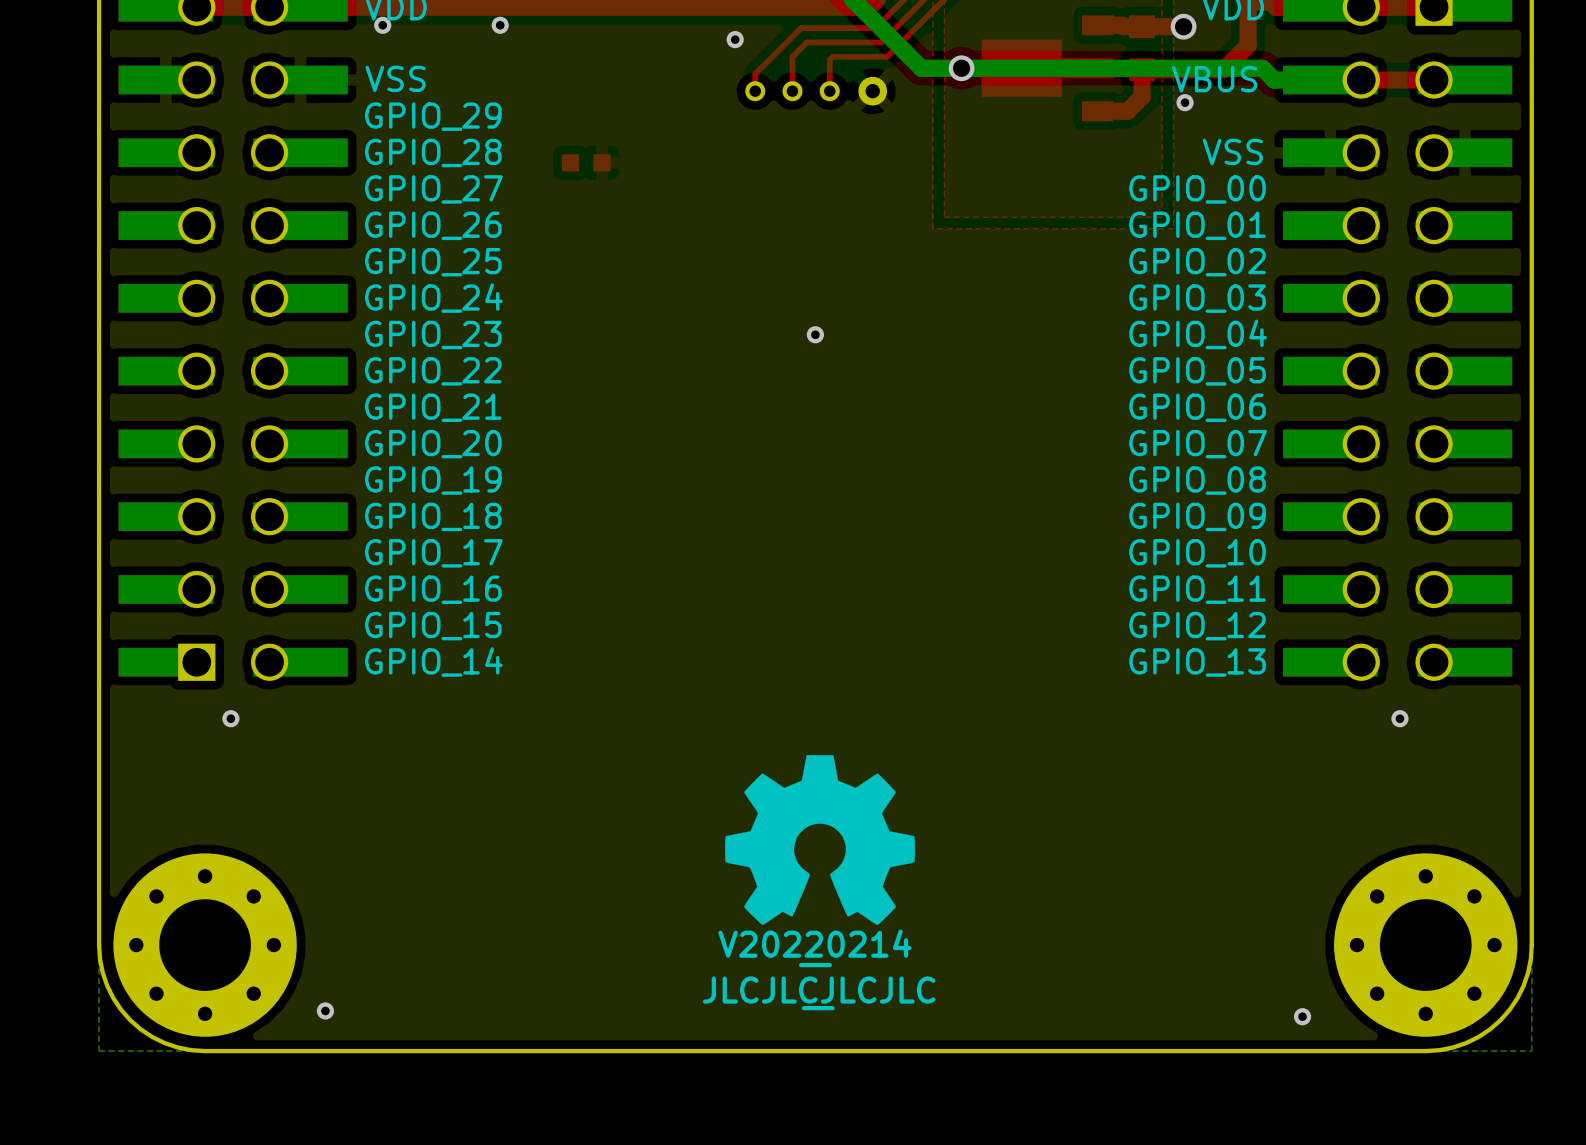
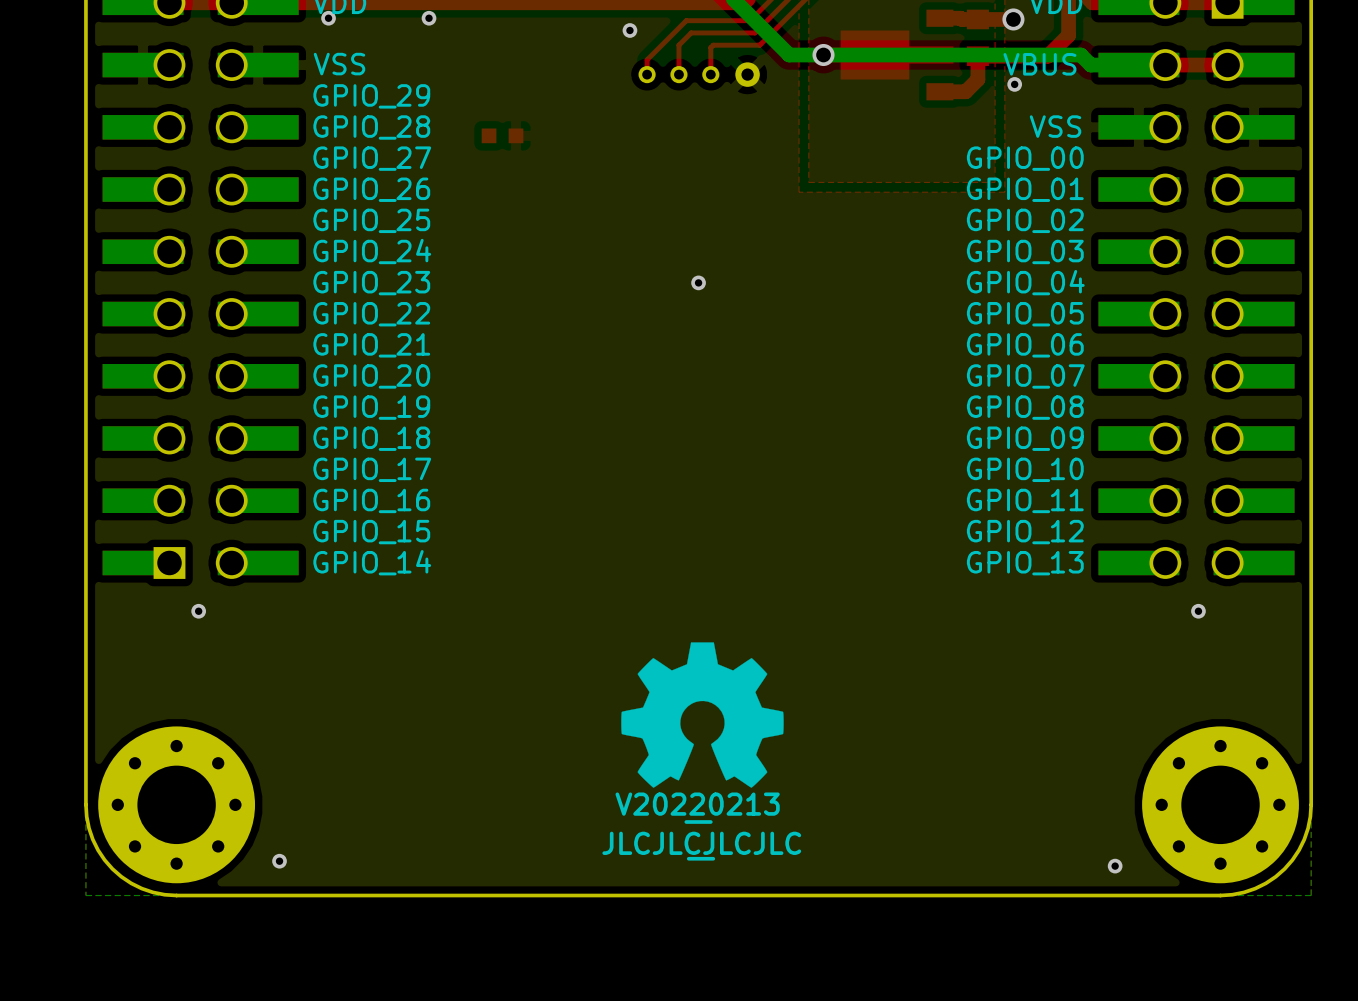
drawing shape: [718, 929, 912, 968] -> [615, 792, 780, 824]

